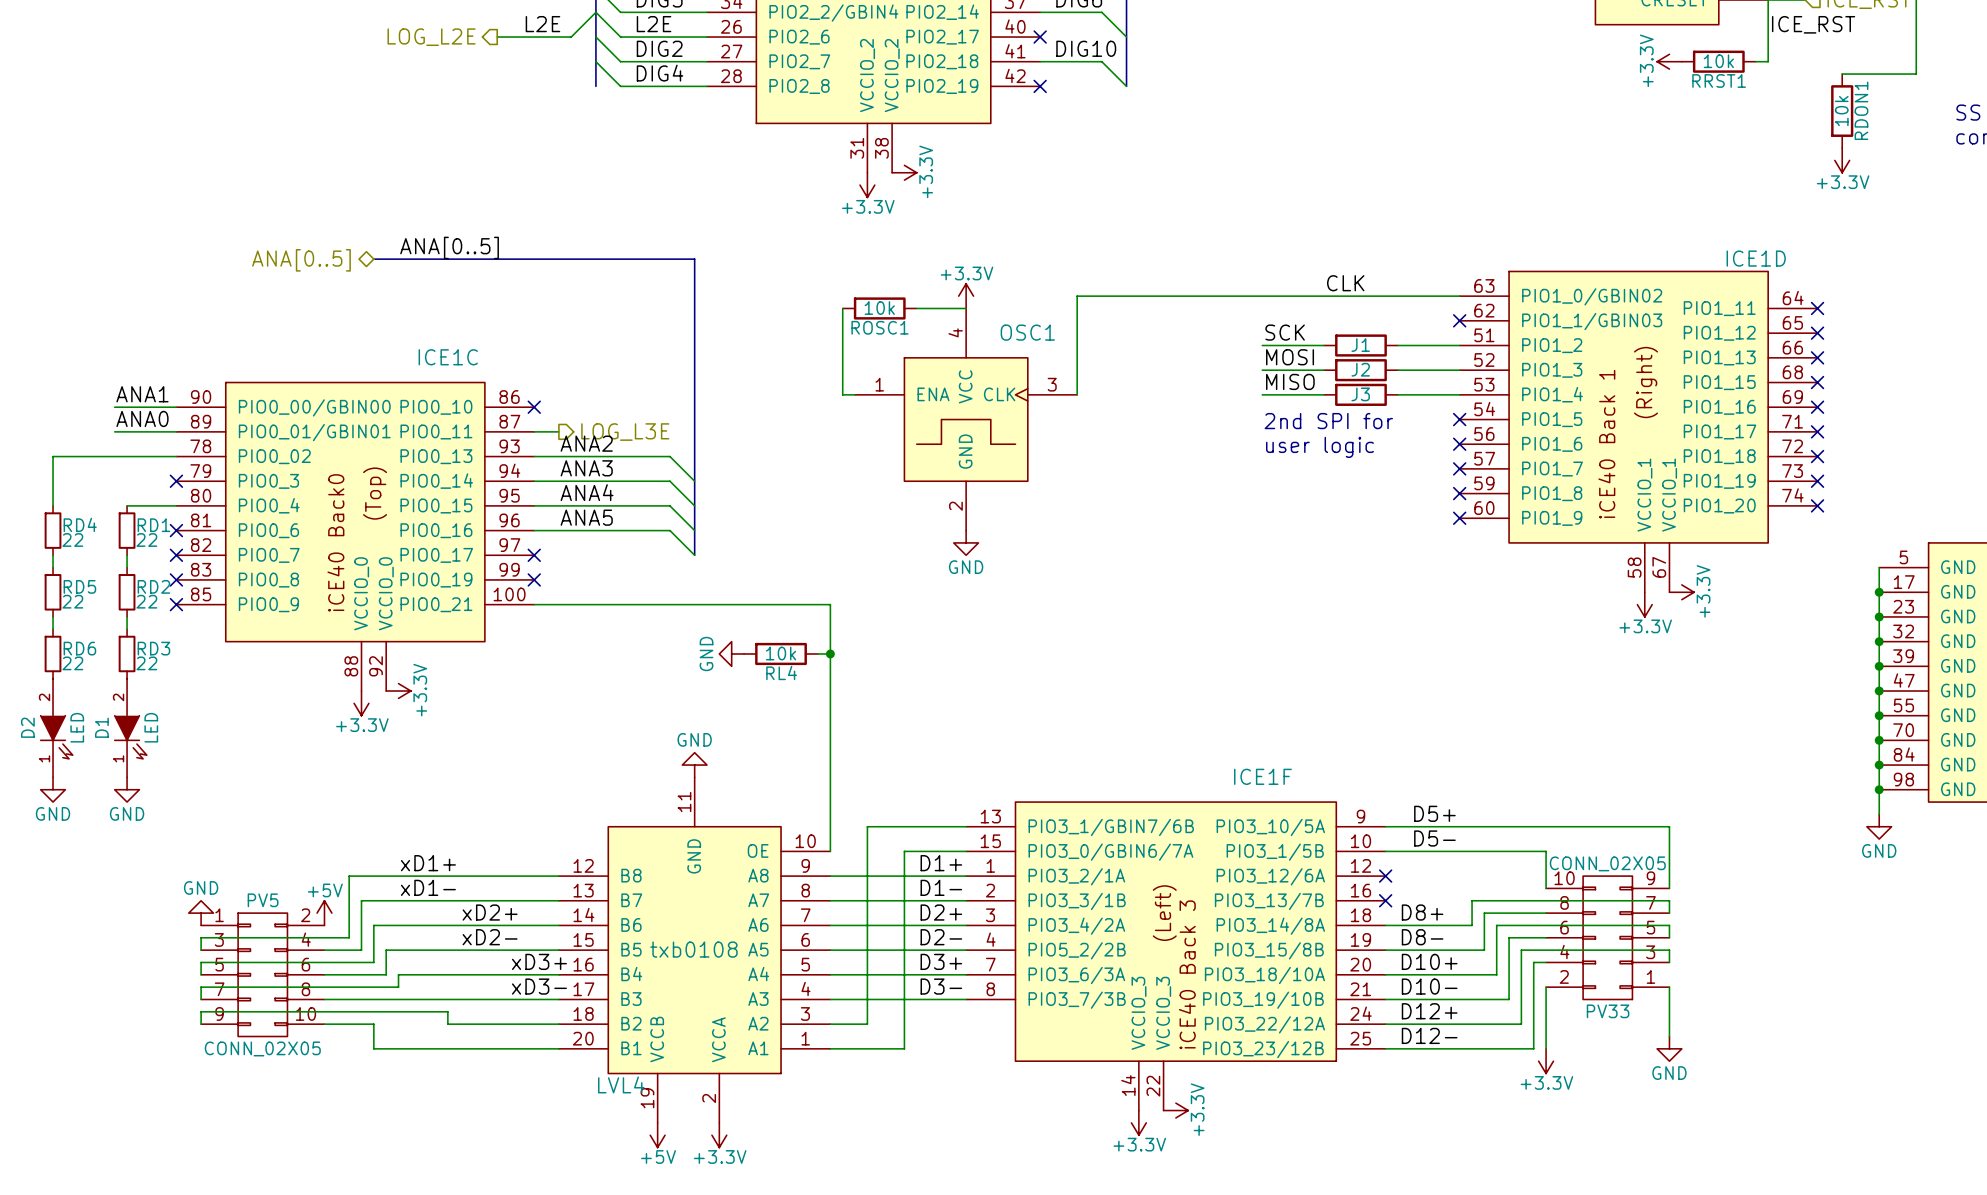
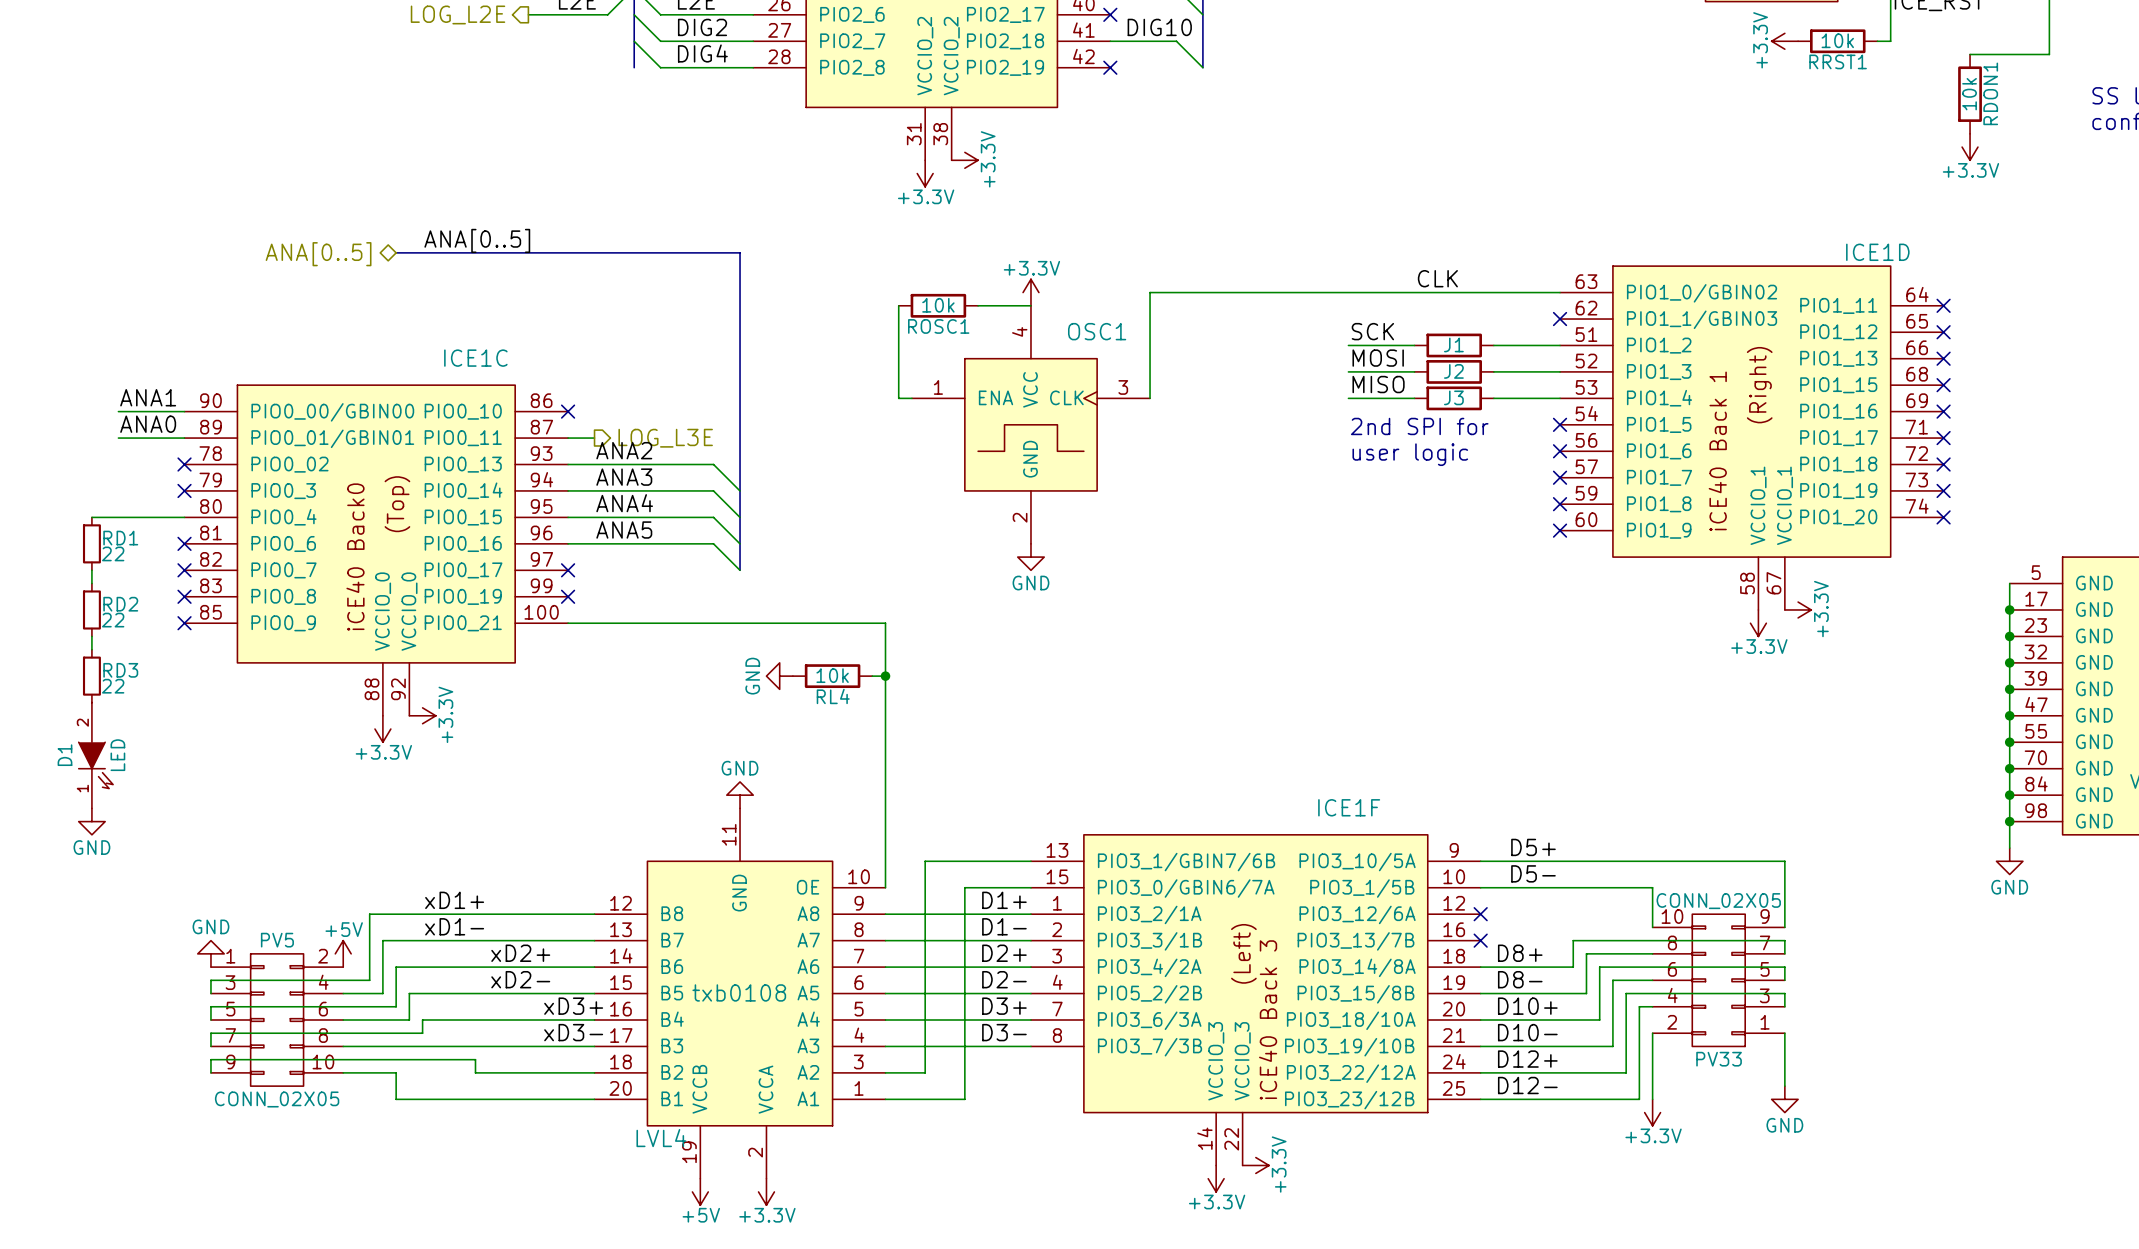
wire: (176, 456) (53, 456) (53, 505) -> none
no-connect mark: none -> (184, 464)
wire: none -> (91, 517) (131, 517)
RD4: 22 (53, 530) -> none
RD1 position: (127, 530) -> (91, 543)
wire: (53, 555) (53, 567) -> (91, 570) (91, 583)
wire: (127, 555) (127, 567) -> none
RD5: 22 (53, 592) -> none
RD2 position: (127, 592) -> (91, 609)
wire: (53, 616) (53, 629) -> (91, 636) (91, 649)
wire: (127, 616) (127, 629) -> none
RD6: 22 (53, 653) -> none
RD3 position: (127, 653) -> (91, 676)
D2: LED (56, 728) -> none
D1 position: (130, 728) -> (95, 755)
power symbol: GND (53, 789) -> none
power symbol: none -> GND (91, 821)
power symbol: GND (127, 789) -> none

